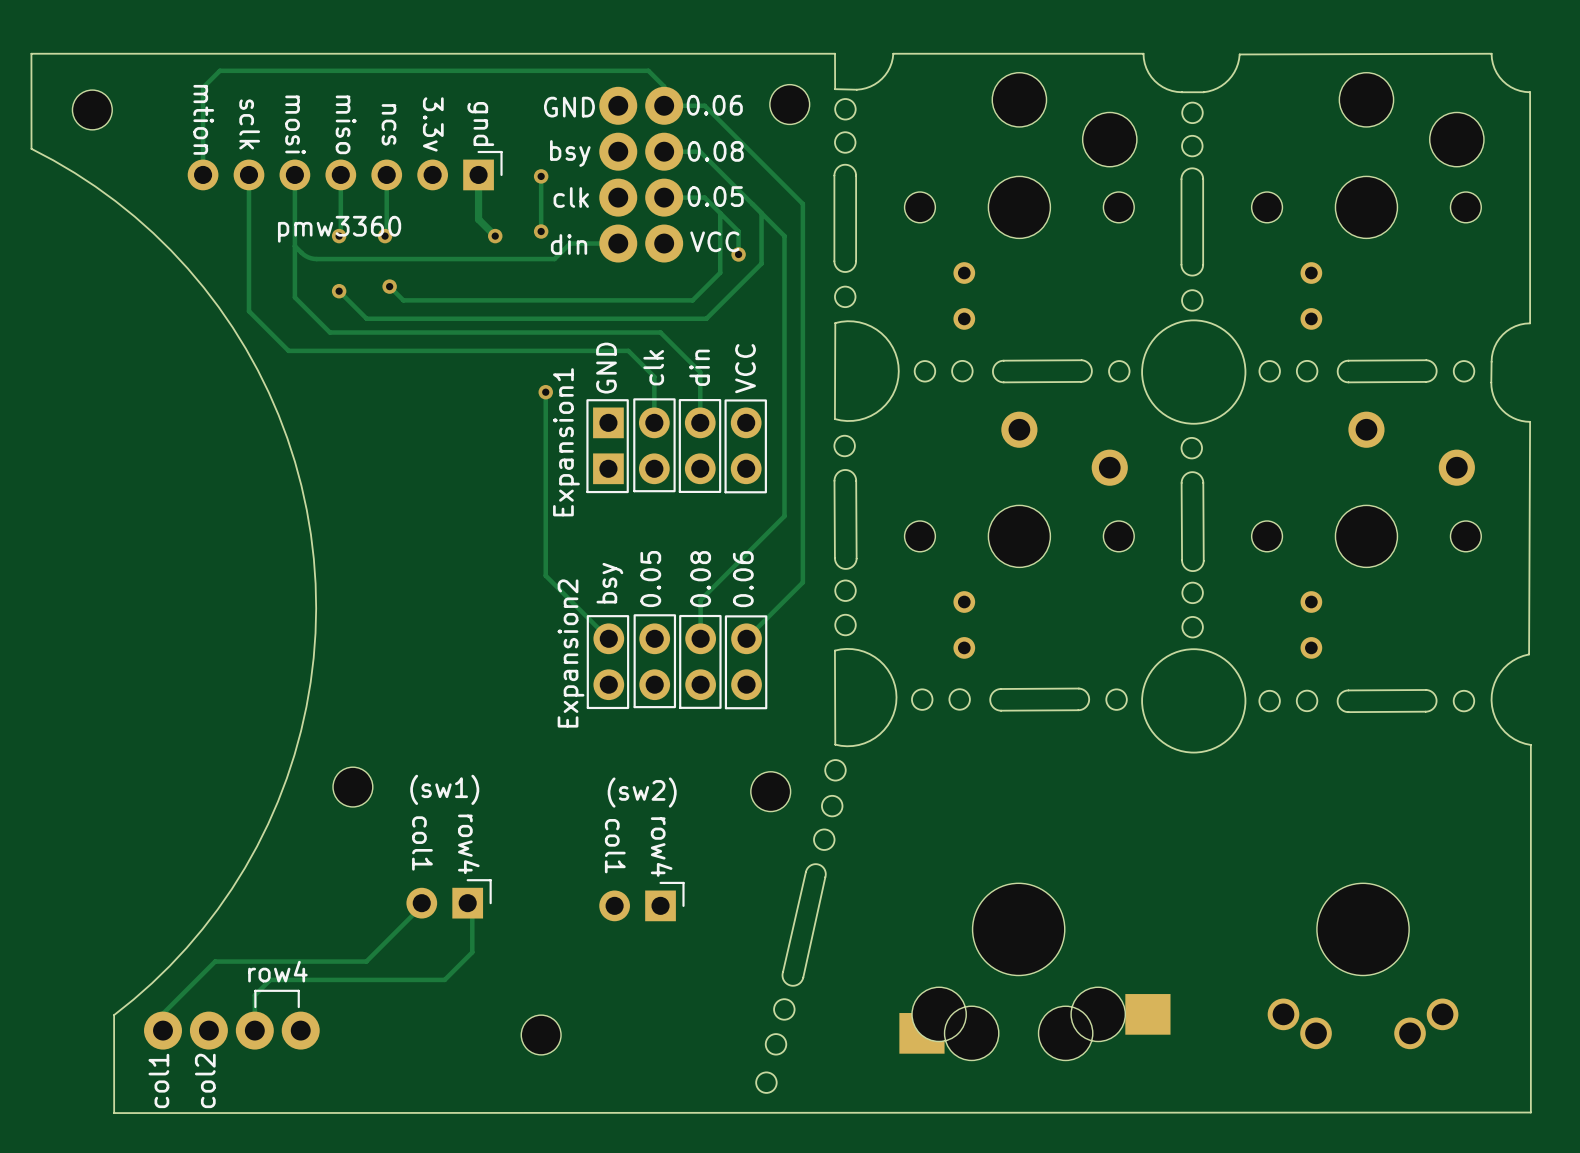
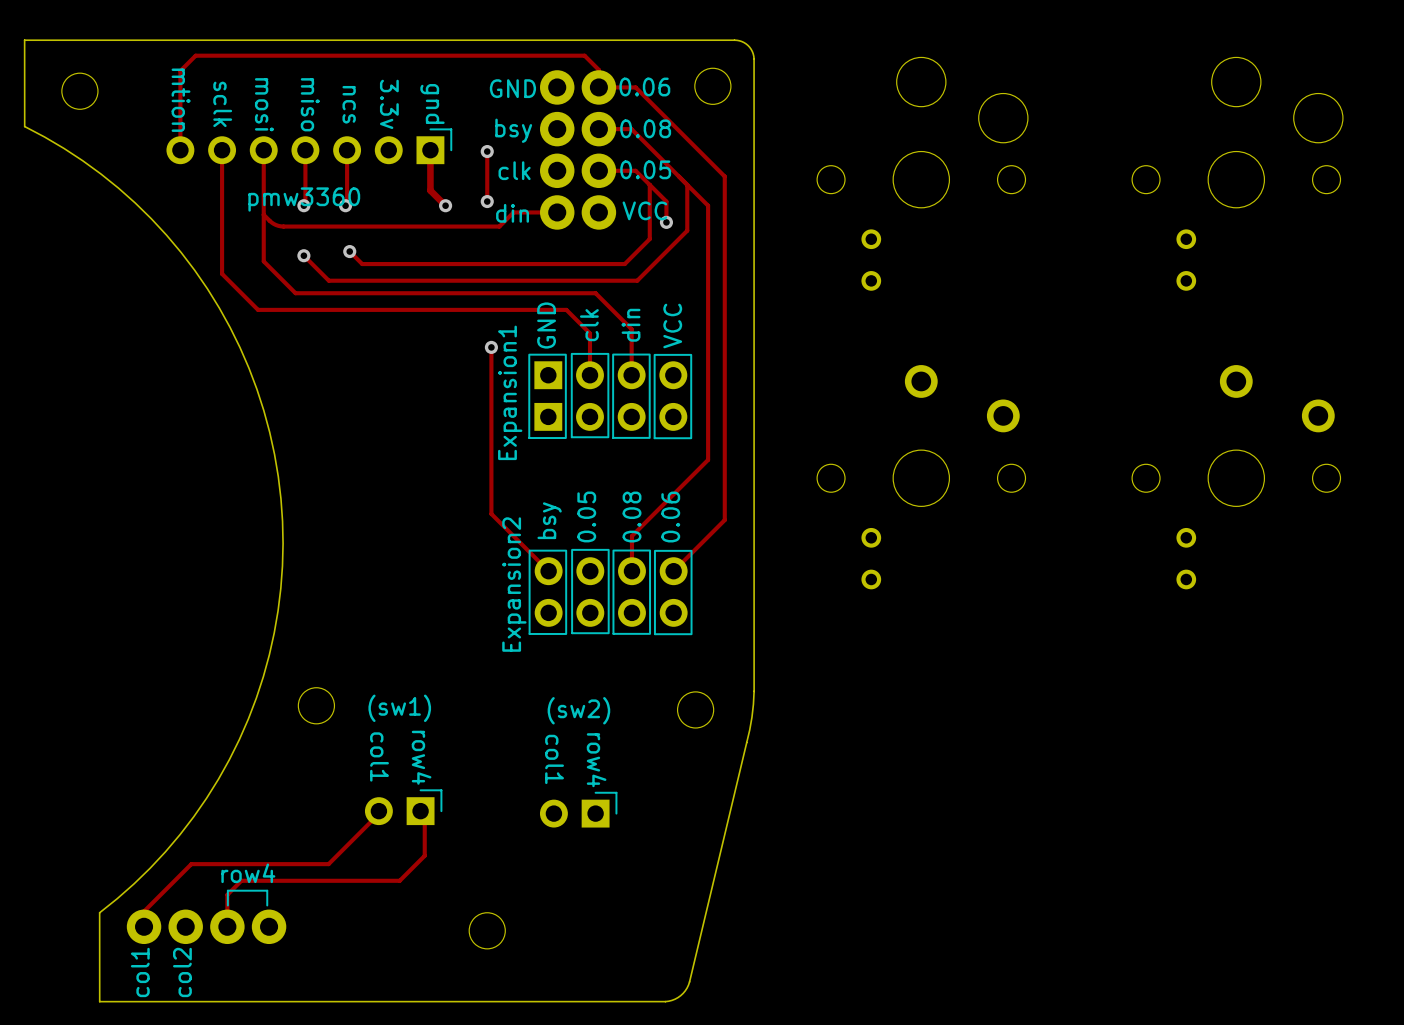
board edge: (813, 53) (835, 53) (835, 89) (856, 89) (870, 86) (882, 78) (890, 67) (893, 53) (1143, 53) (1146, 68) (1154, 80) (1167, 89) (1182, 92) (1203, 92) (1221, 85) (1234, 72) (1239, 54) (1491, 53) (1494, 68) (1502, 80) (1515, 89) (1530, 92) (1530, 323) (1510, 328) (1496, 342) (1491, 356) (1491, 382) (1494, 399) (1502, 410) (1513, 417) (1530, 421) (1529, 654) (1512, 660) (1500, 672) (1492, 688) (1491, 700) (1495, 717) (1505, 732) (1514, 739) (1530, 744) (1530, 1112) (114, 1113) -> (734, 40) (748, 45) (754, 58) (754, 691) (749, 730) (689, 981) (685, 990) (675, 999) (665, 1001) (99, 1001)
round board edge: [834, 98, 857, 121] -> none
round board edge: [1181, 101, 1204, 125] -> none
round board edge: [834, 131, 857, 154] -> none
round board edge: [1181, 134, 1204, 158] -> none
board edge: (834, 175) (834, 262) (838, 269) (846, 271) (852, 268) (855, 262) (855, 174) (851, 166) (843, 164) (837, 167) (834, 175) -> none
board edge: (1181, 179) (1181, 266) (1185, 272) (1193, 275) (1200, 271) (1203, 266) (1203, 177) (1198, 170) (1191, 168) (1184, 171) (1181, 179) -> none
round board edge: [834, 285, 857, 309] -> none
round board edge: [1181, 289, 1204, 312] -> none
round board edge: [1141, 319, 1247, 425] -> none
board edge: (835, 323) (834, 419) (847, 421) (865, 418) (881, 409) (892, 394) (897, 383) (898, 371) (895, 353) (885, 337) (871, 326) (853, 321) (835, 323) -> none
round board edge: [951, 359, 974, 383] -> none
round board edge: [1295, 359, 1319, 383] -> none
round board edge: [913, 360, 937, 383] -> none
board edge: (1081, 360) (1002, 360) (995, 364) (993, 372) (996, 379) (1002, 382) (1082, 381) (1089, 377) (1091, 369) (1087, 362) (1081, 360) -> none
round board edge: [1108, 360, 1131, 383] -> none
round board edge: [1258, 360, 1281, 383] -> none
board edge: (1426, 360) (1347, 360) (1339, 365) (1337, 372) (1341, 379) (1347, 382) (1427, 381) (1434, 377) (1436, 371) (1433, 363) (1426, 360) -> none
round board edge: [1452, 360, 1476, 383] -> none
round board edge: [833, 434, 856, 458] -> none
round board edge: [1180, 437, 1203, 460] -> none
board edge: (834, 480) (835, 559) (839, 566) (846, 568) (853, 566) (856, 558) (856, 479) (852, 472) (845, 469) (838, 472) (834, 480) -> none
board edge: (1181, 482) (1182, 561) (1186, 568) (1194, 571) (1201, 567) (1203, 560) (1203, 481) (1200, 475) (1192, 472) (1184, 475) (1181, 482) -> none
round board edge: [834, 579, 857, 602] -> none
round board edge: [1181, 581, 1204, 605] -> none
round board edge: [834, 613, 857, 637] -> none
round board edge: [1181, 616, 1204, 639] -> none
round board edge: [1141, 648, 1247, 754] -> none
board edge: (834, 650) (835, 744) (858, 745) (875, 737) (887, 725) (896, 703) (895, 685) (887, 669) (874, 657) (852, 649) (834, 650) -> none
round board edge: [911, 688, 934, 711] -> none
round board edge: [948, 688, 971, 711] -> none
board edge: (1078, 688) (999, 689) (992, 693) (990, 701) (993, 707) (999, 710) (1079, 710) (1086, 706) (1089, 699) (1086, 691) (1078, 688) -> none
round board edge: [1105, 688, 1128, 711] -> none
round board edge: [1258, 689, 1281, 713] -> none
round board edge: [1295, 689, 1319, 713] -> none
board edge: (1426, 689) (1347, 690) (1340, 694) (1337, 702) (1340, 708) (1347, 712) (1427, 711) (1433, 708) (1436, 701) (1433, 693) (1426, 689) -> none
round board edge: [1452, 689, 1476, 713] -> none
round board edge: [824, 759, 847, 782] -> none
round board edge: [821, 794, 844, 818] -> none
round board edge: [813, 828, 836, 851] -> none
board edge: (805, 872) (782, 974) (784, 981) (791, 985) (799, 983) (802, 978) (825, 875) (824, 868) (818, 864) (810, 865) (805, 872) -> none
part: (1363, 966) -> none
part: (1034, 971) -> none
round board edge: [773, 998, 796, 1021] -> none
round board edge: [764, 1033, 788, 1056] -> none
round board edge: [755, 1071, 778, 1094] -> none

